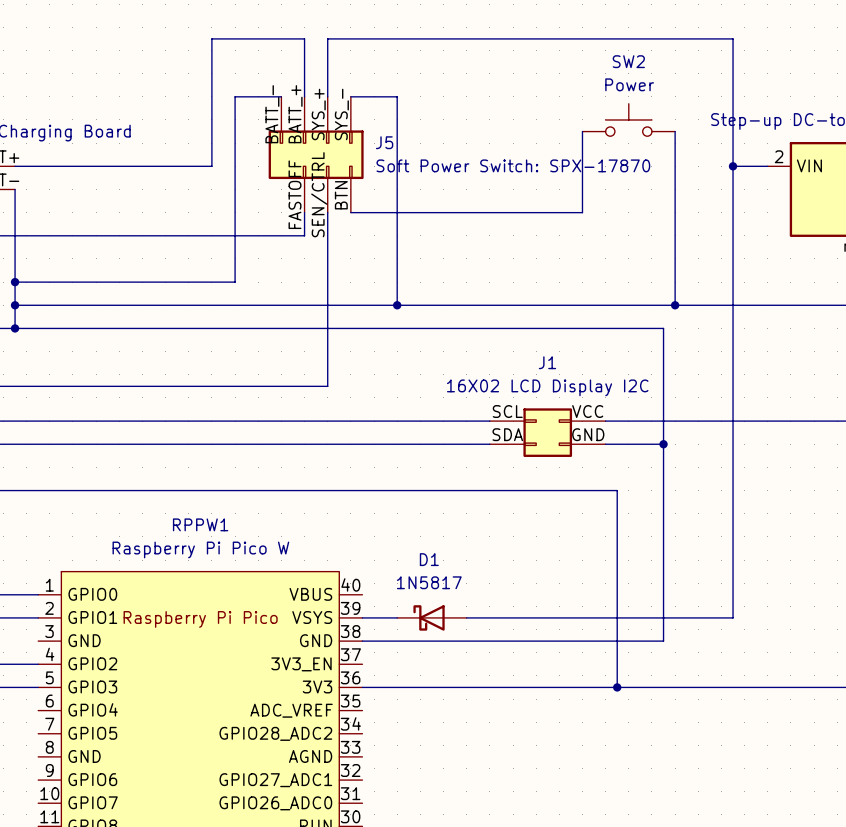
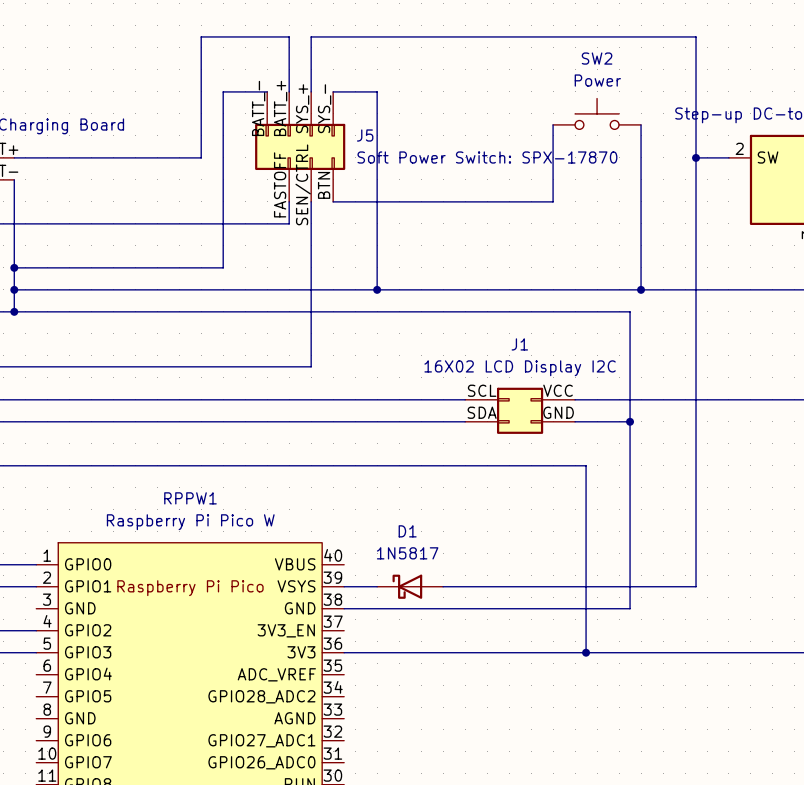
part pin name: VIN (809, 165) -> SW (768, 157)

